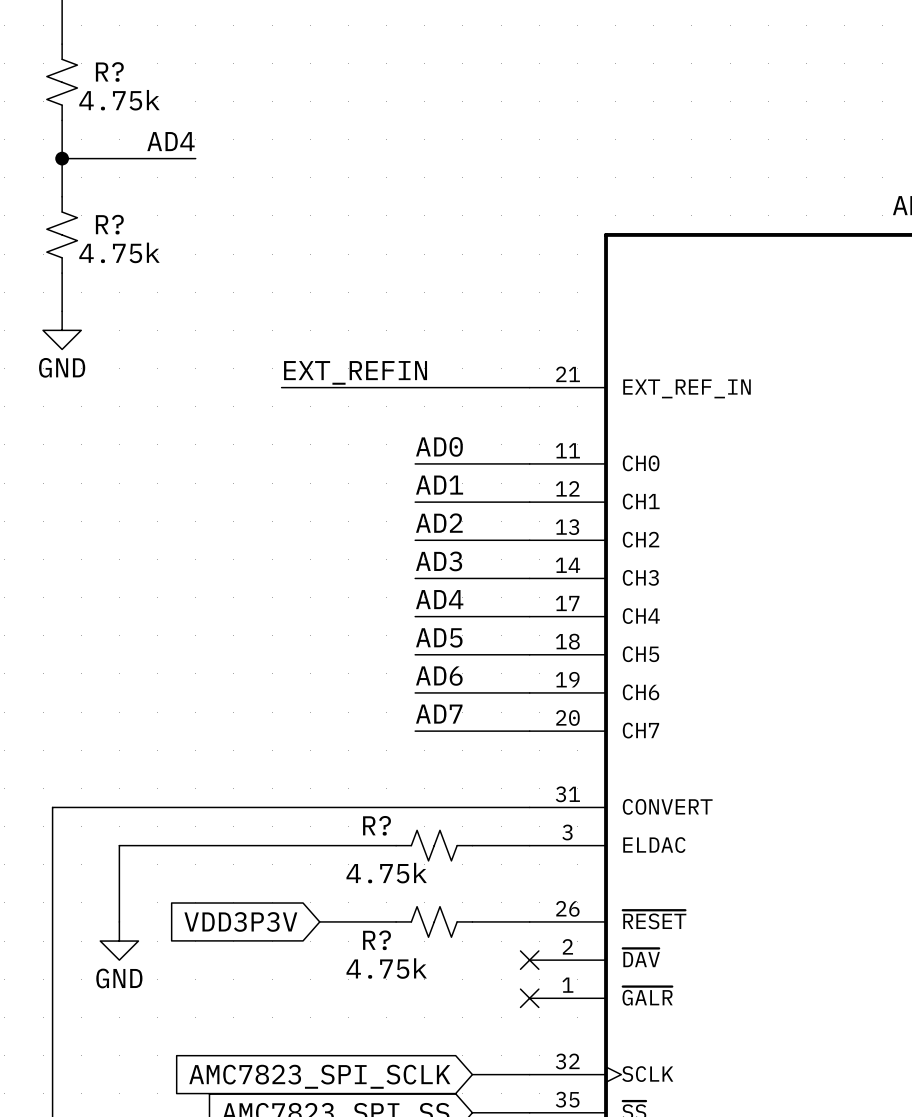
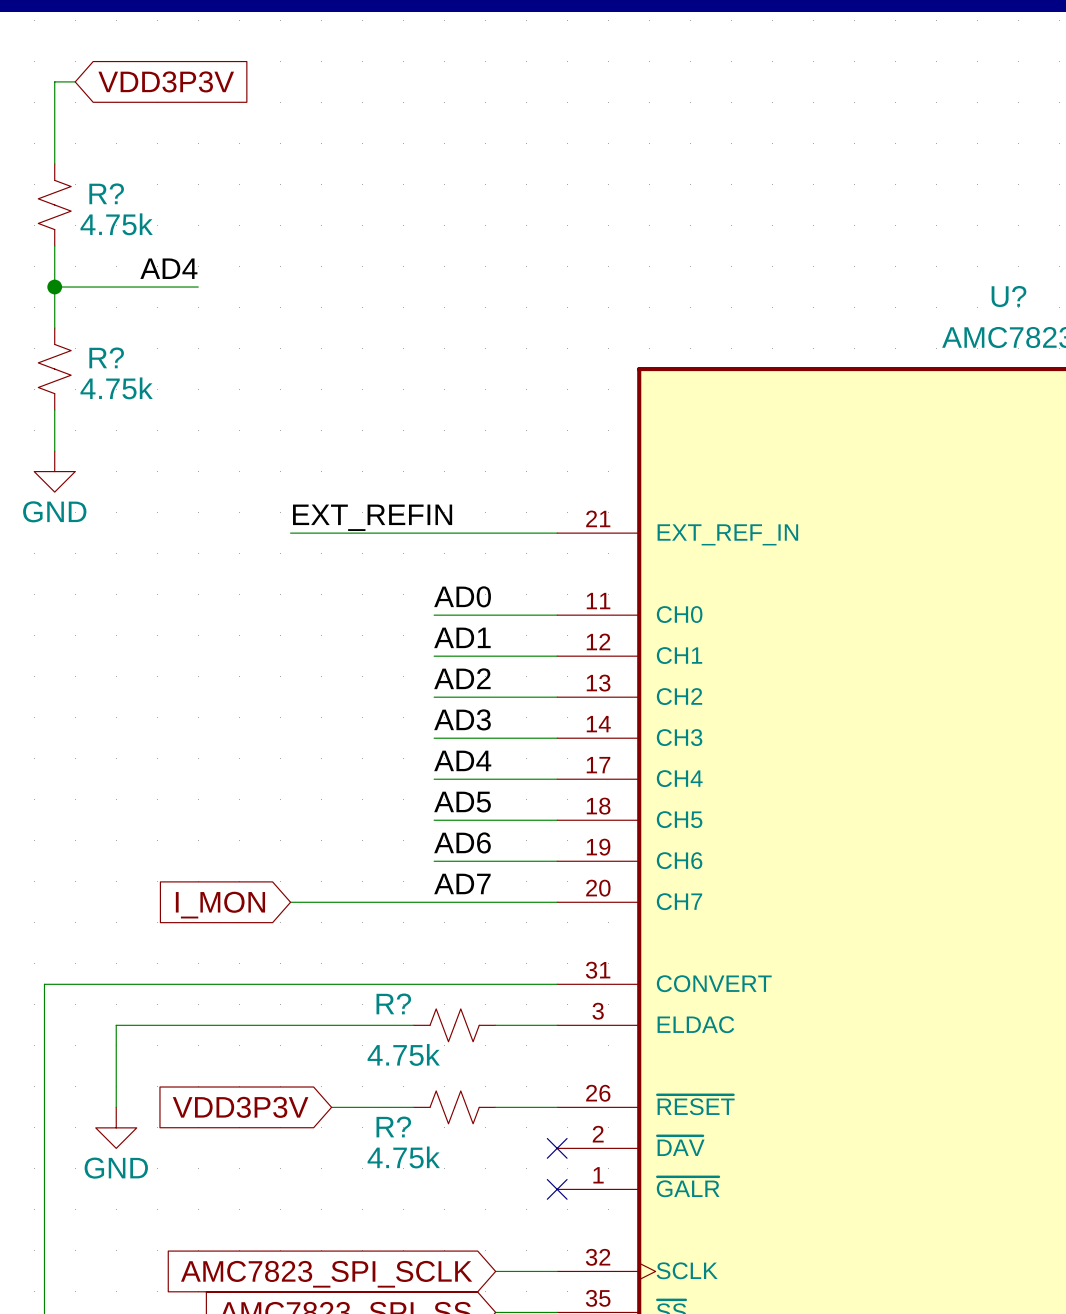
wire: none -> (290, 902) (434, 902)
global label: none -> I_MON (220, 905)

